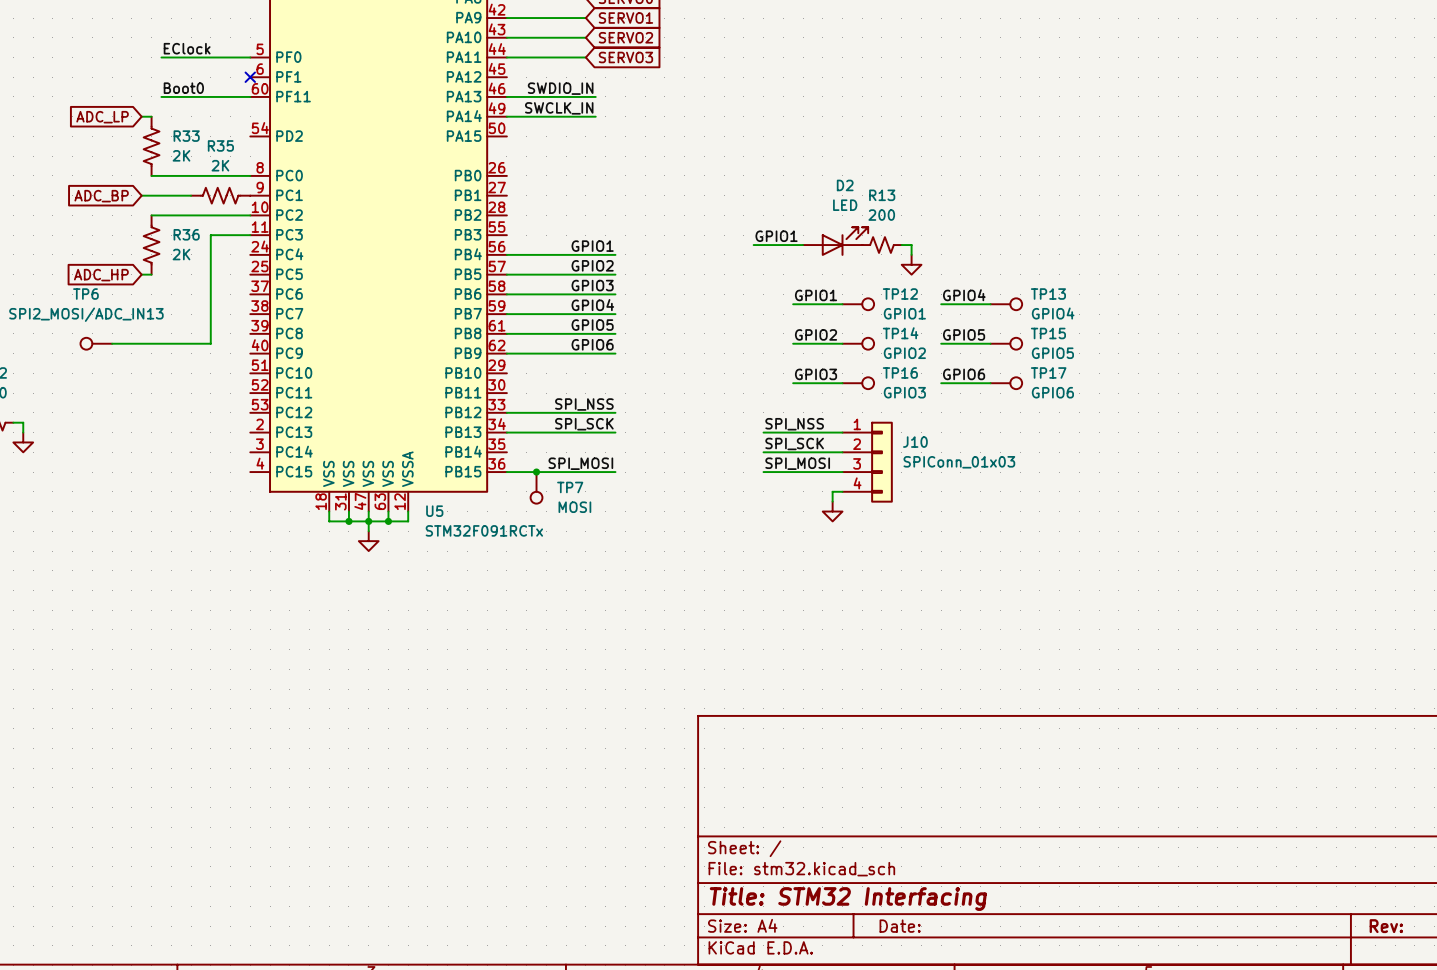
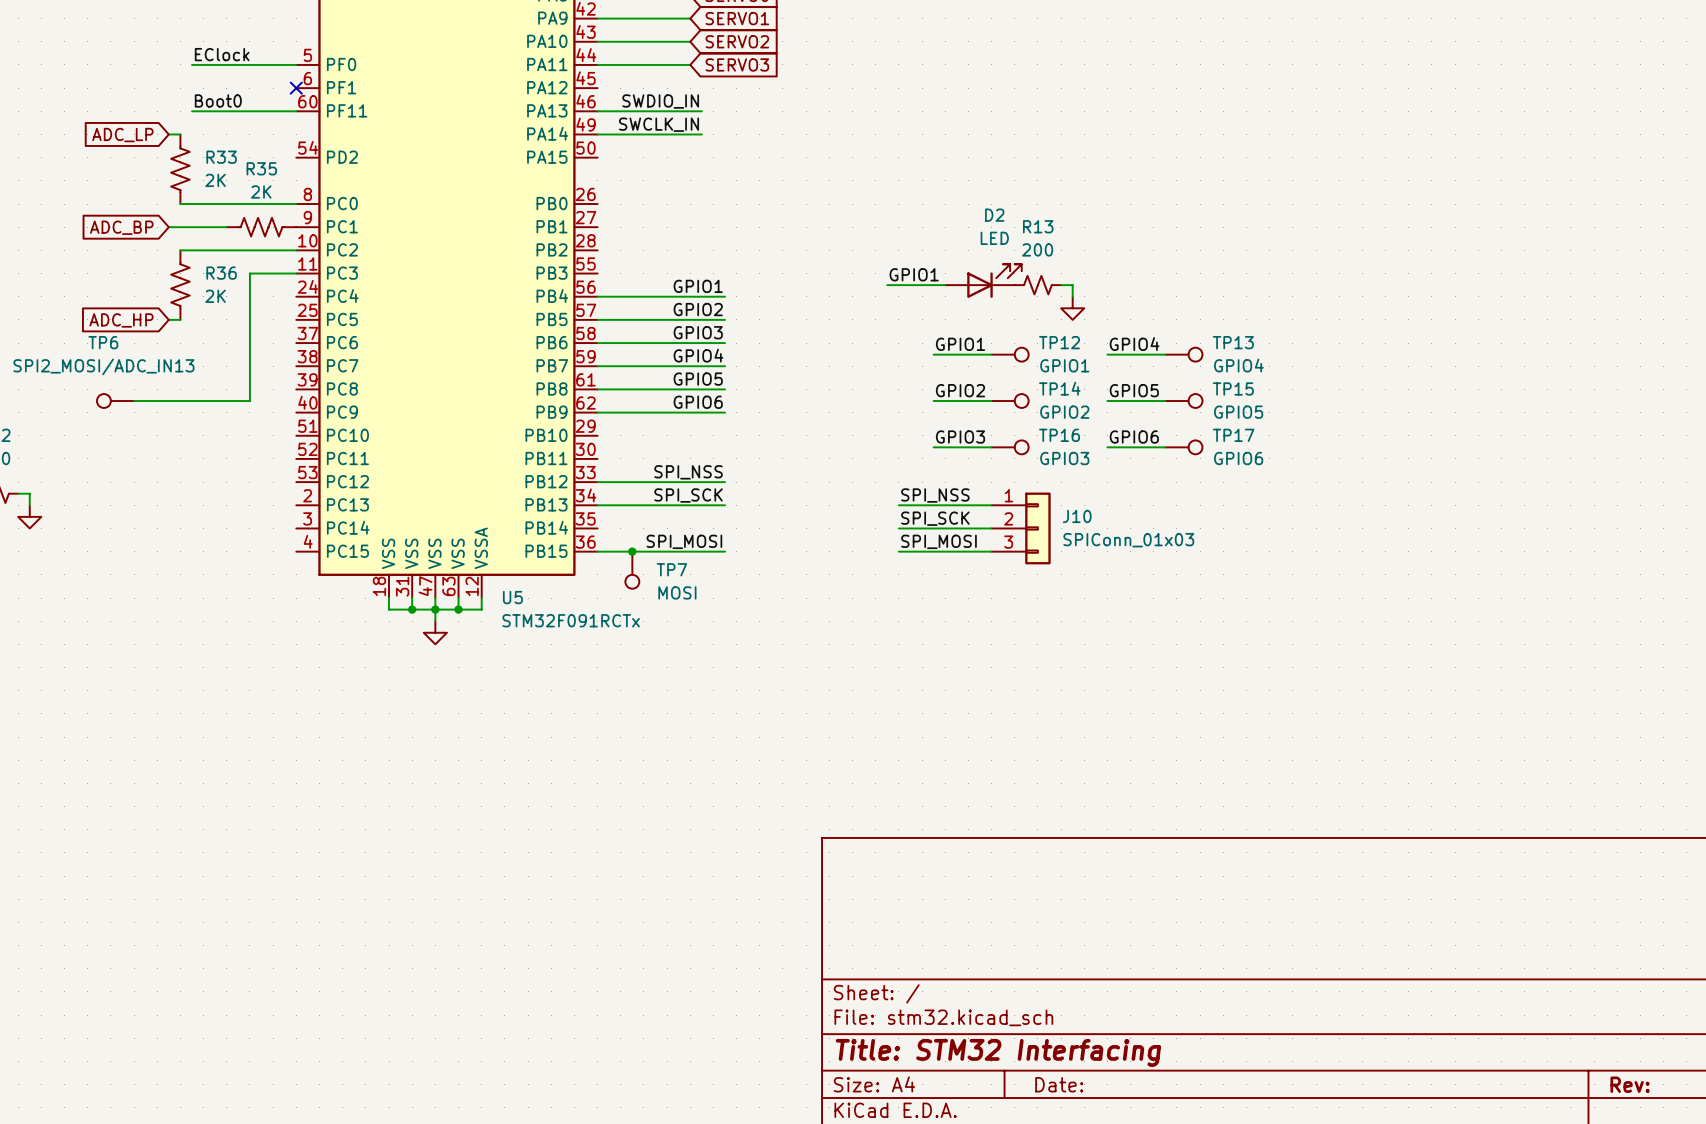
J10 symbol: [842, 421, 893, 503] -> [991, 492, 1051, 565]
wire: (842, 491) (832, 491) (832, 501) -> none
power symbol: (832, 511) -> none

